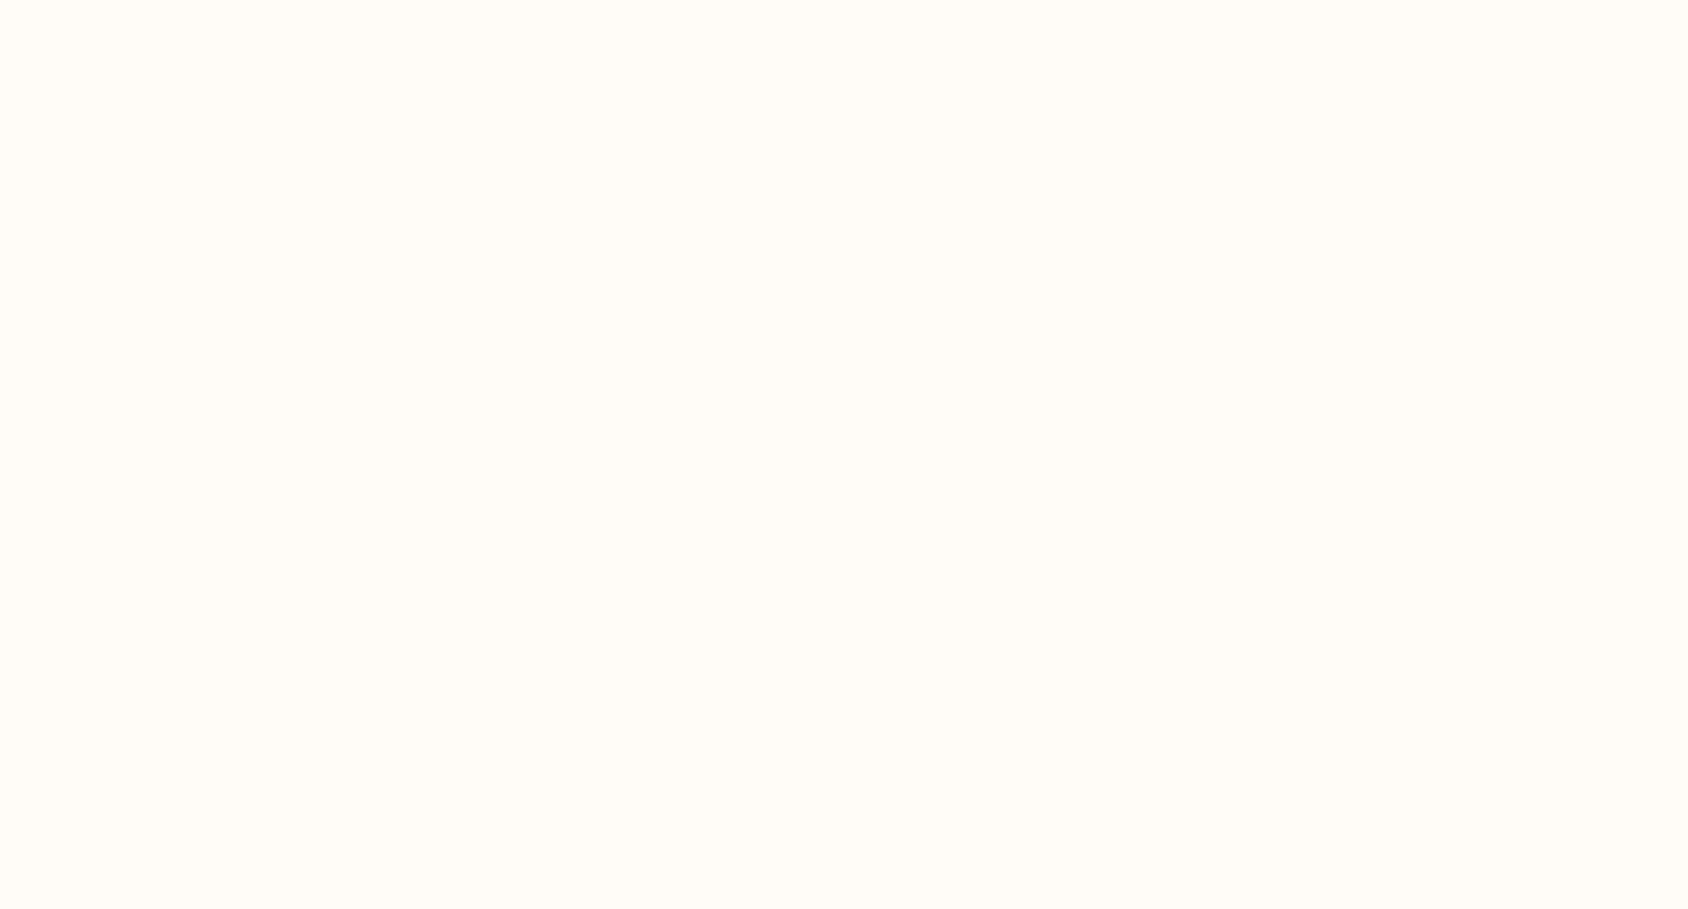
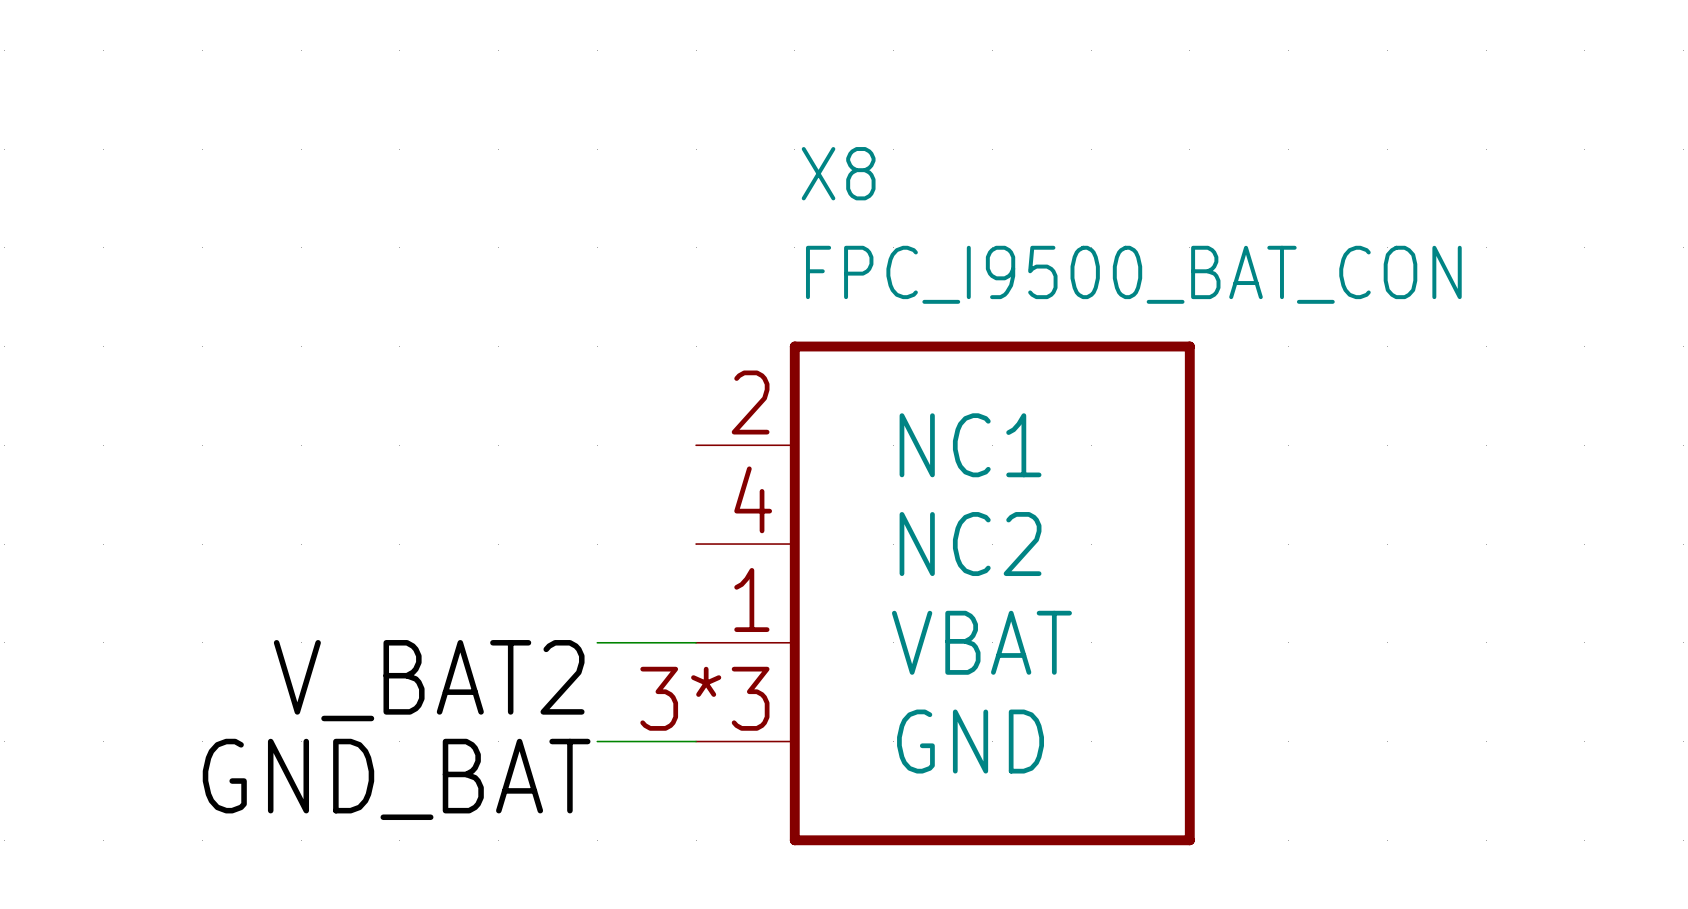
X8: none -> FPC_I9500_BAT_CON (945, 593)
wire: none -> (597, 642) (696, 642)
label: none -> V_BAT2 (429, 680)
wire: none -> (597, 741) (696, 741)
label: none -> GND_BAT (396, 779)

